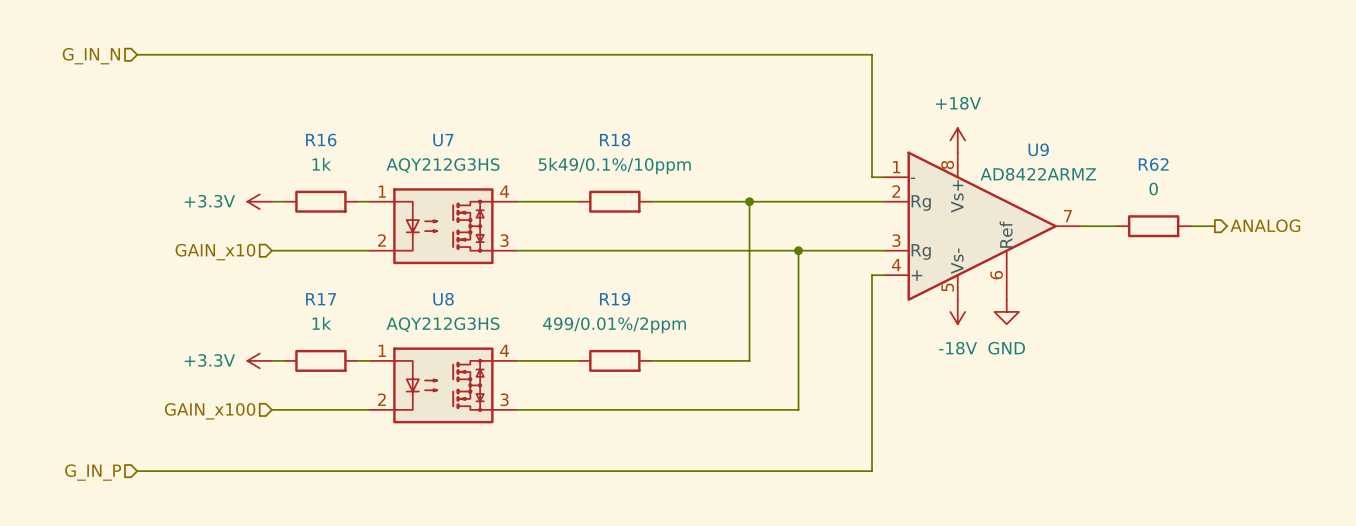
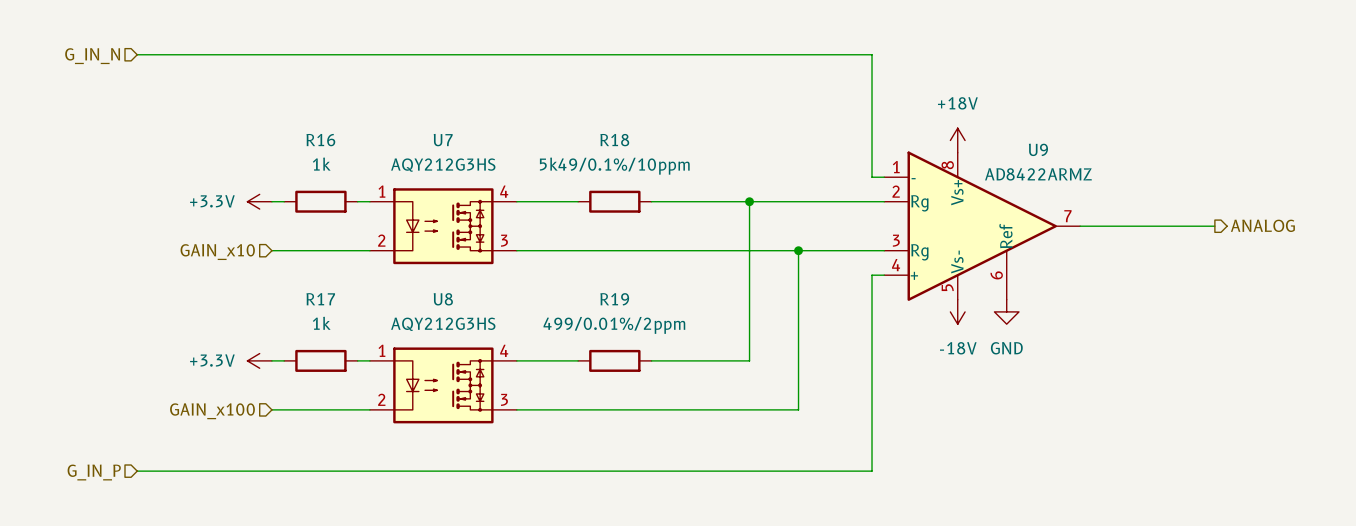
wire: none -> (1116, 226) (1190, 226)
R62: 0 (1153, 226) -> none

